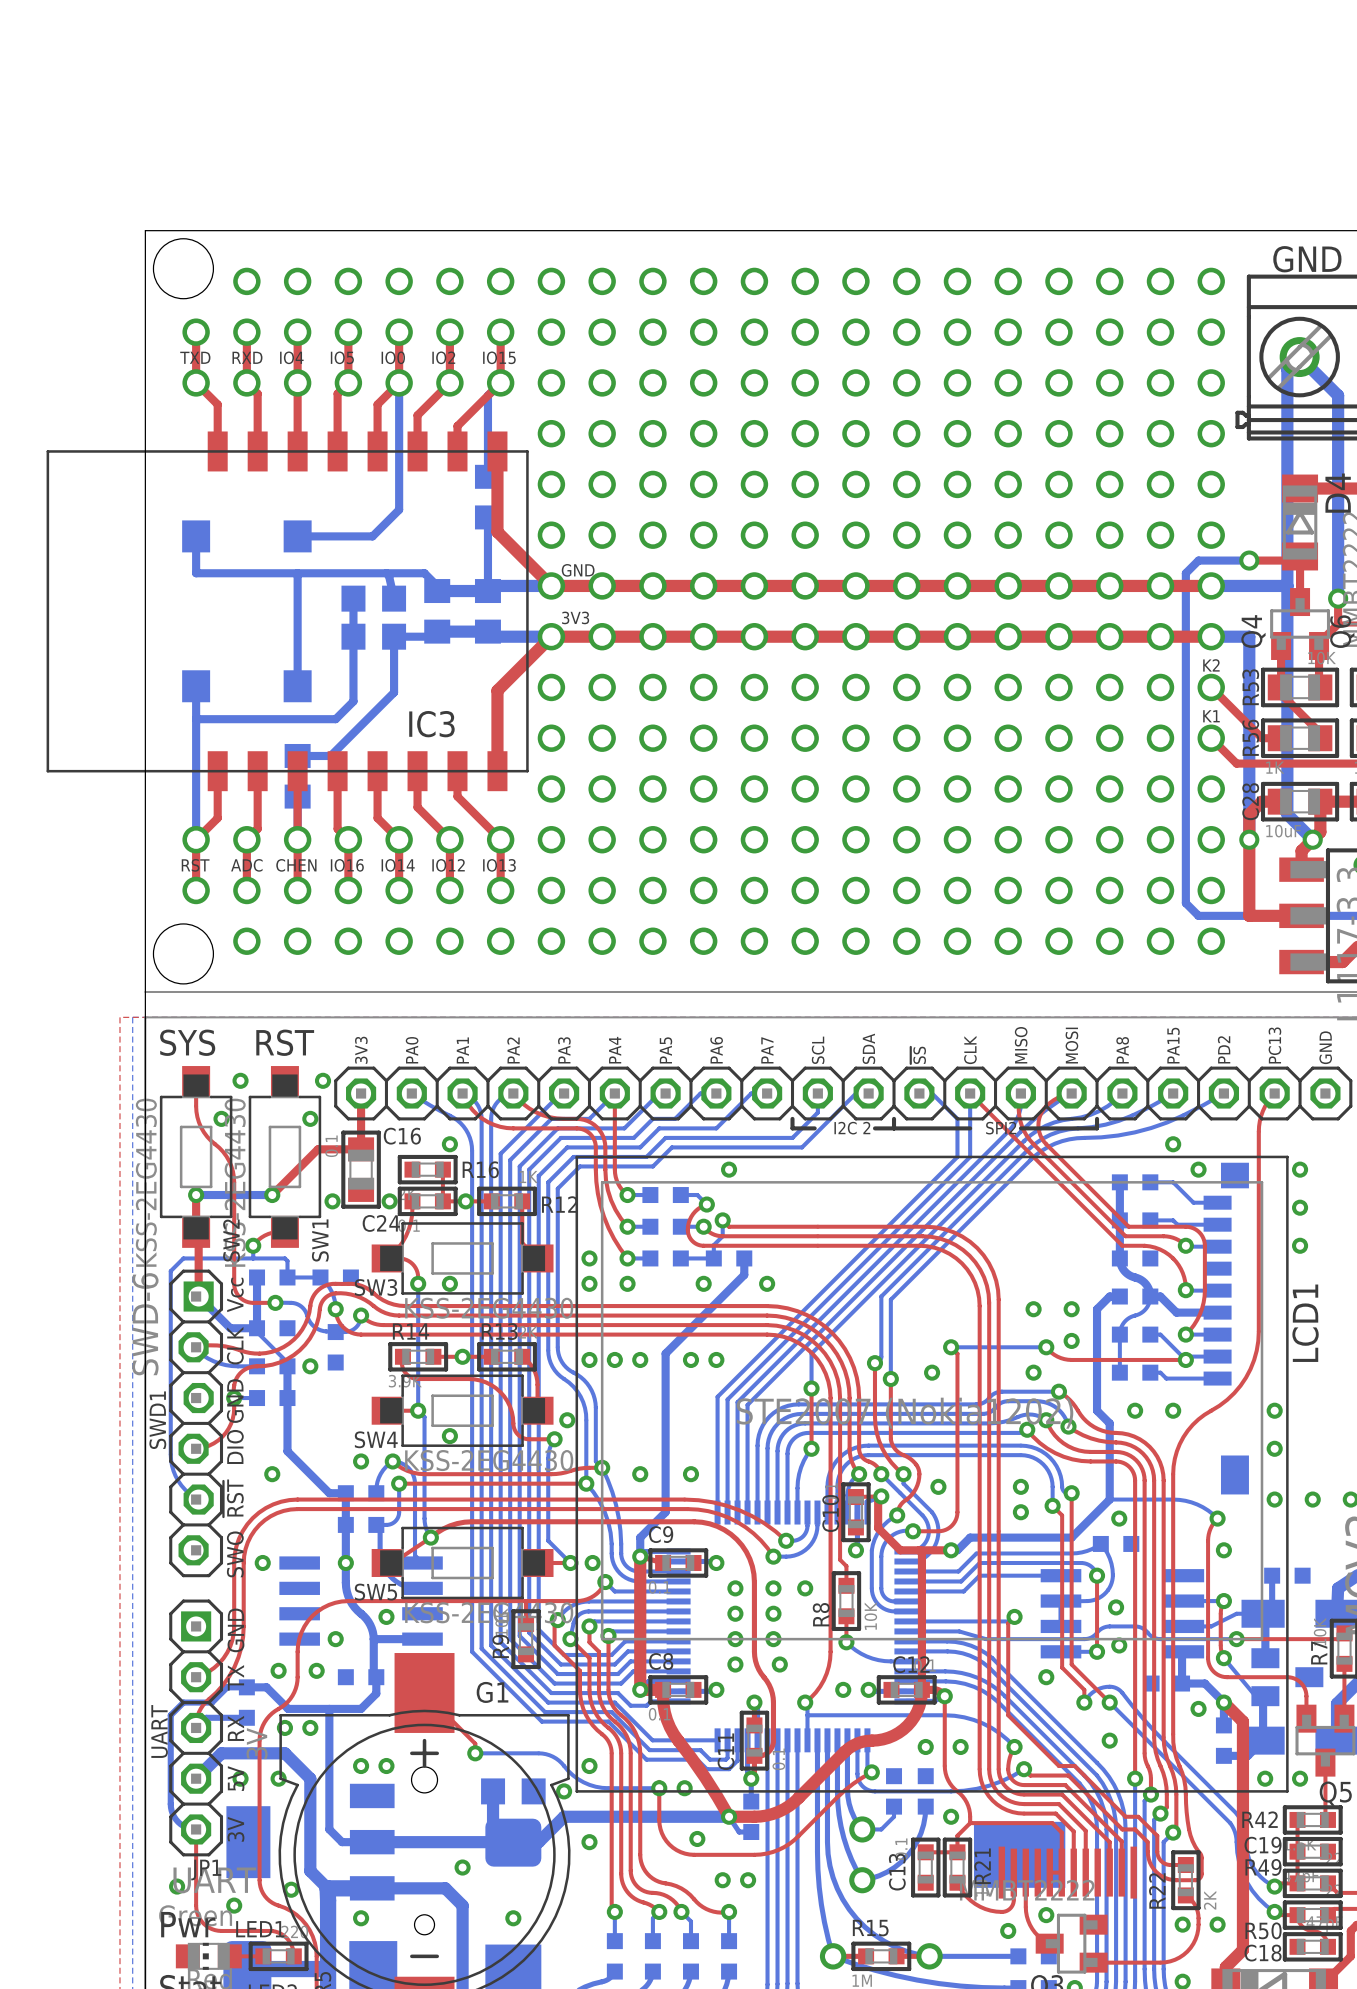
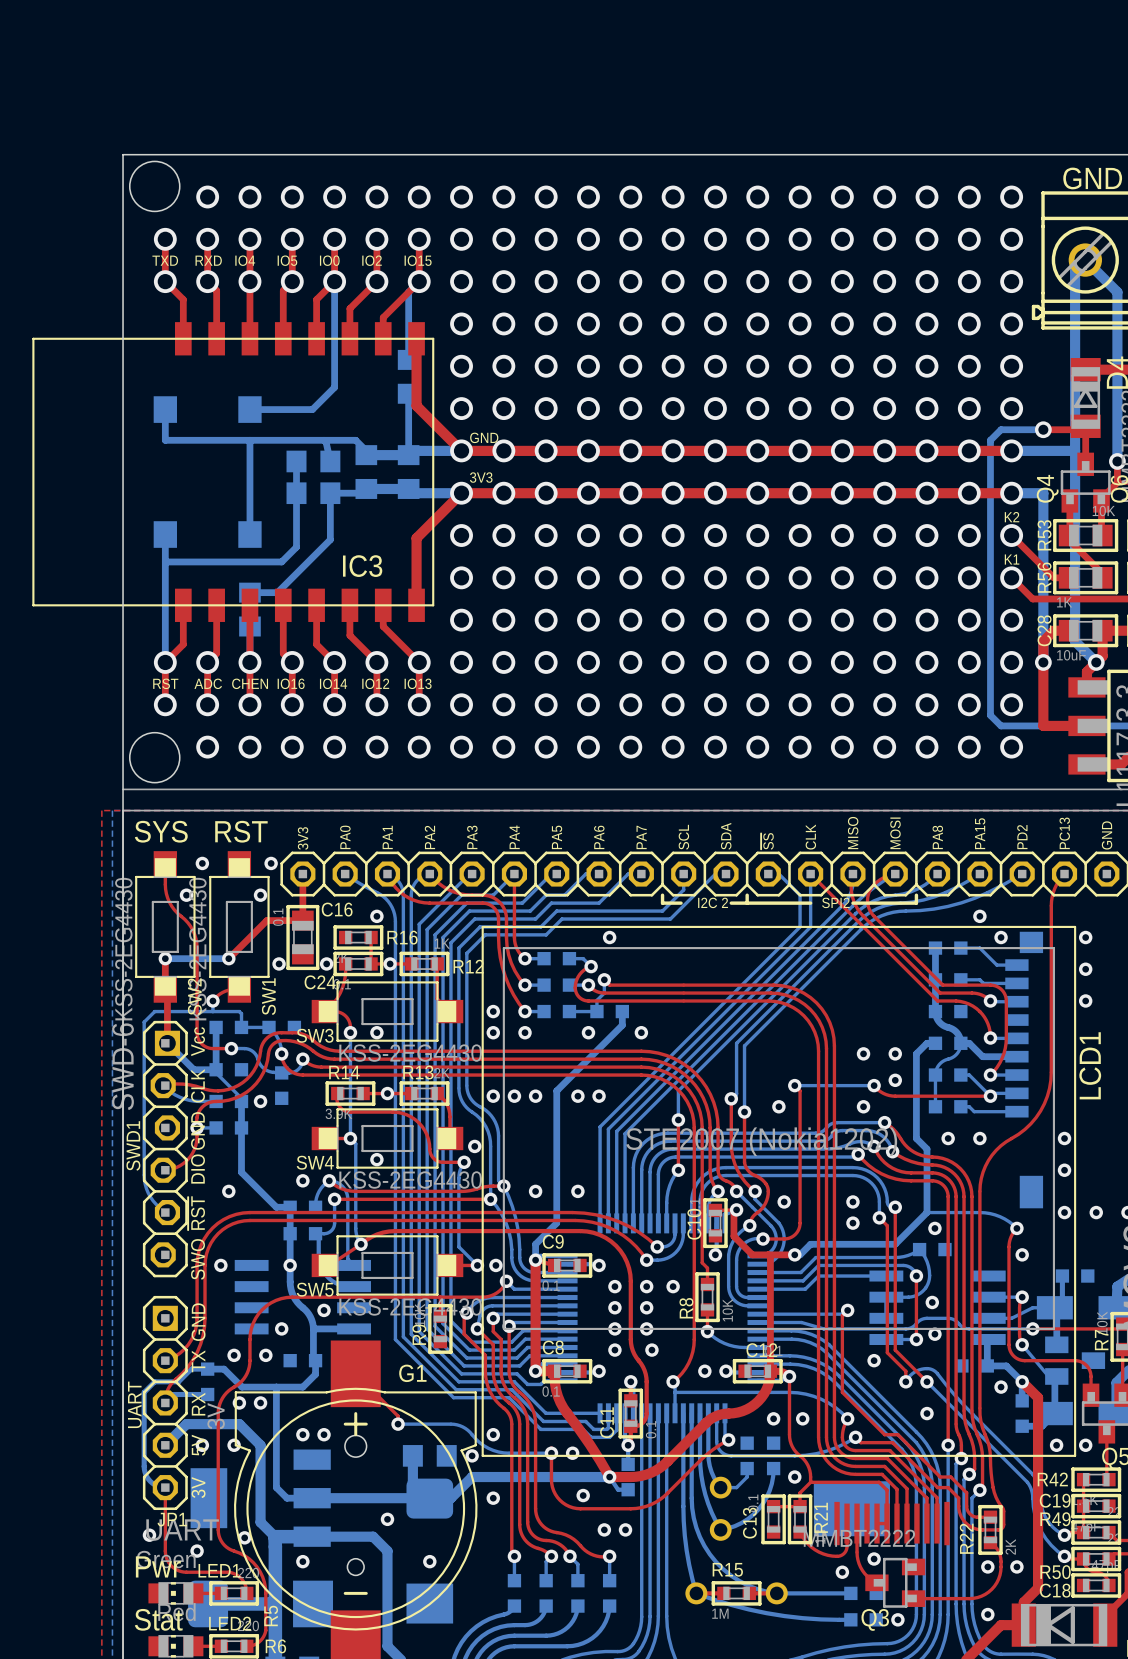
IC3 footprint: [46, 431, 529, 792] -> [32, 322, 435, 622]

